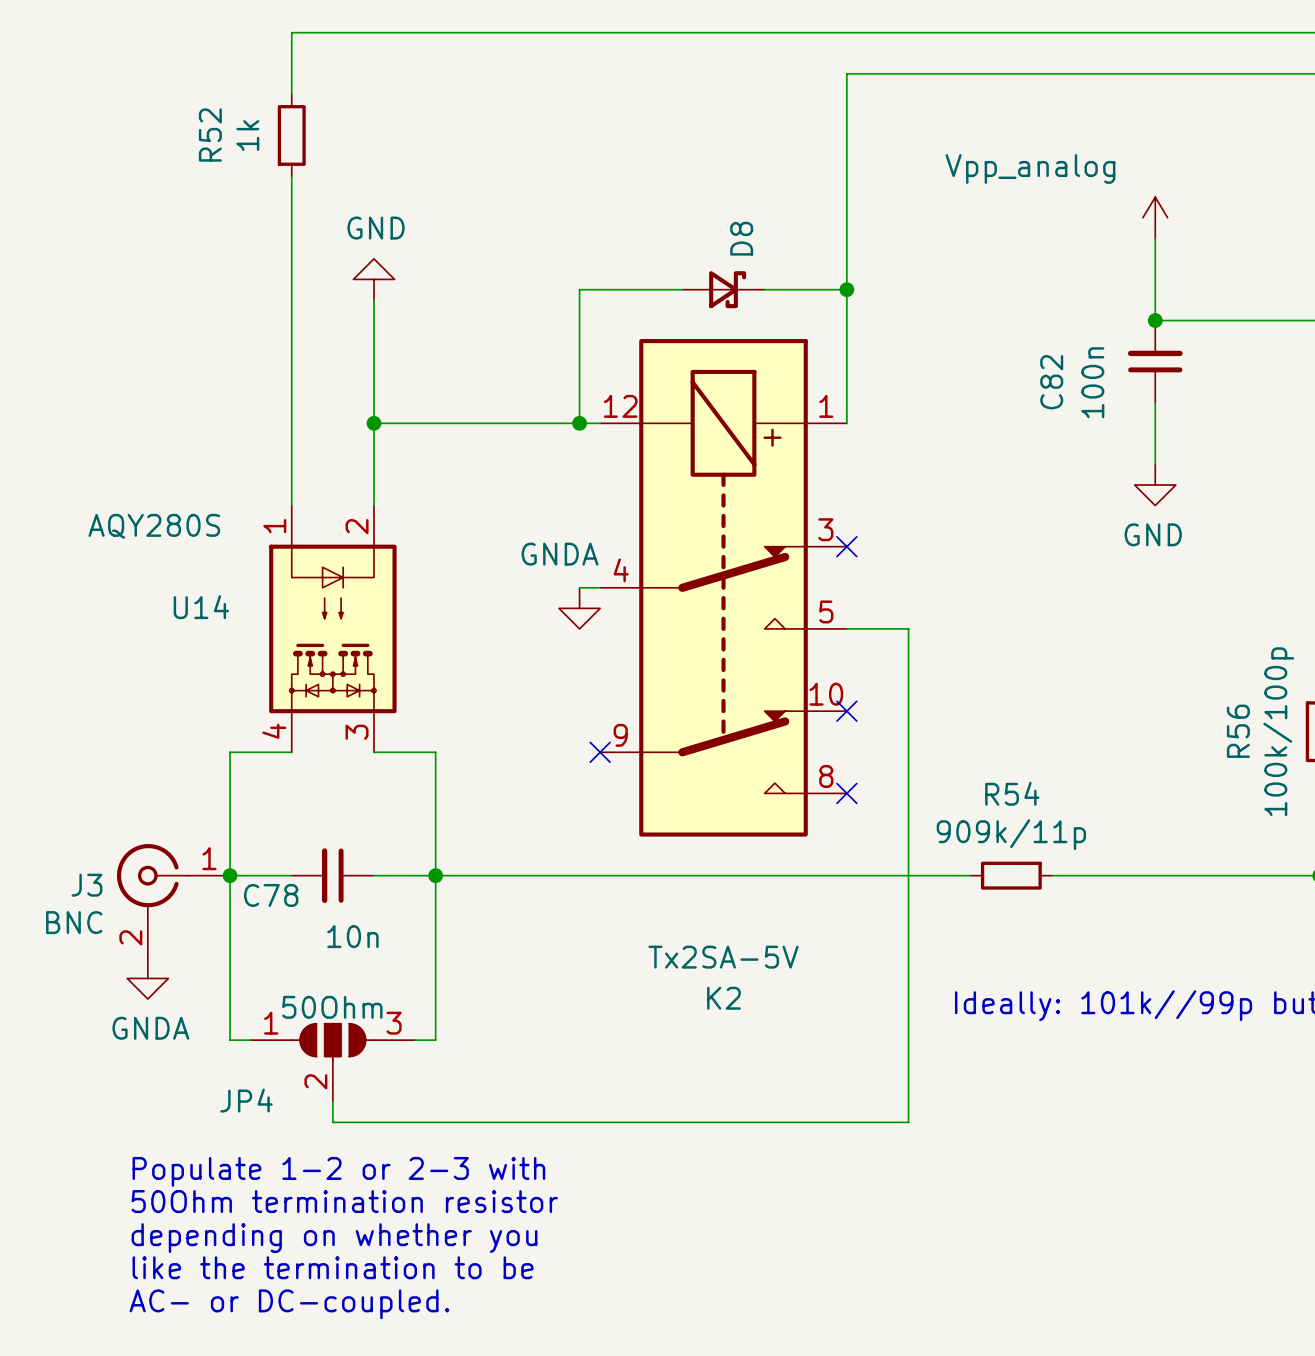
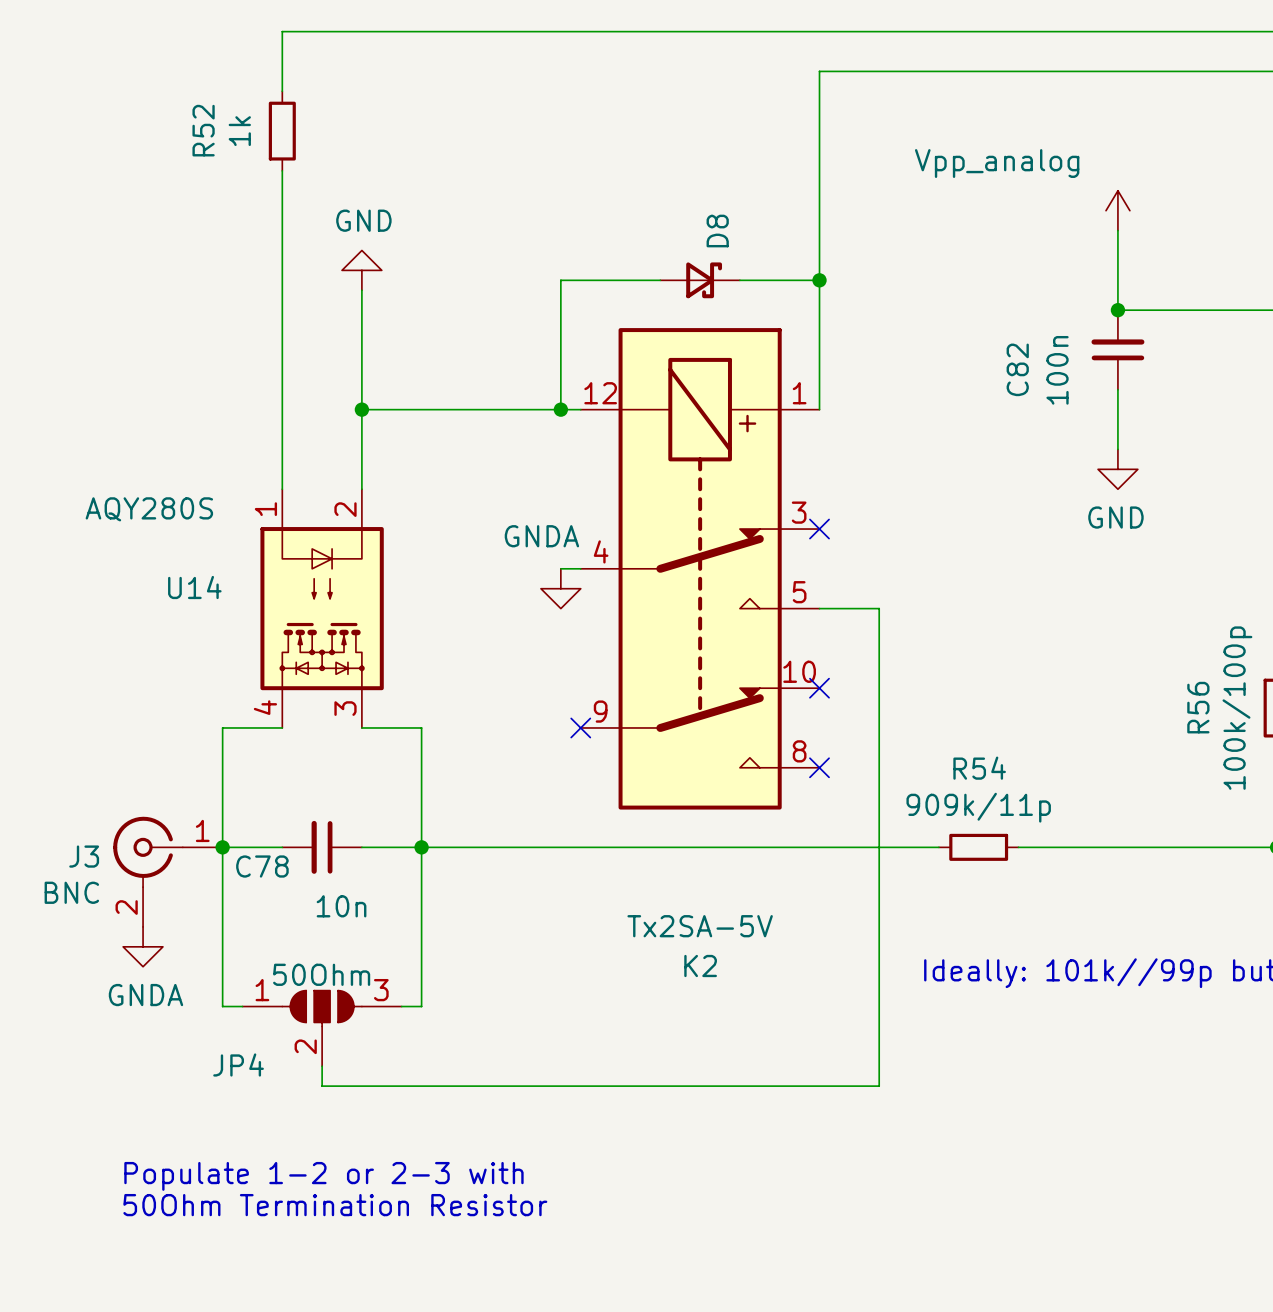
text position: Populate 1-2 or 2-3 with (338, 1171) -> Populate 1-2 or 2-3 with (323, 1176)
text: 50Ohm termination resistor (344, 1201) -> none
text: depending on whether you (334, 1238) -> none
text: none -> 50Ohm Termination Resistor (335, 1205)
text: like the termination to be (333, 1267) -> none
text: AC- or DC-coupled. (289, 1304) -> none

